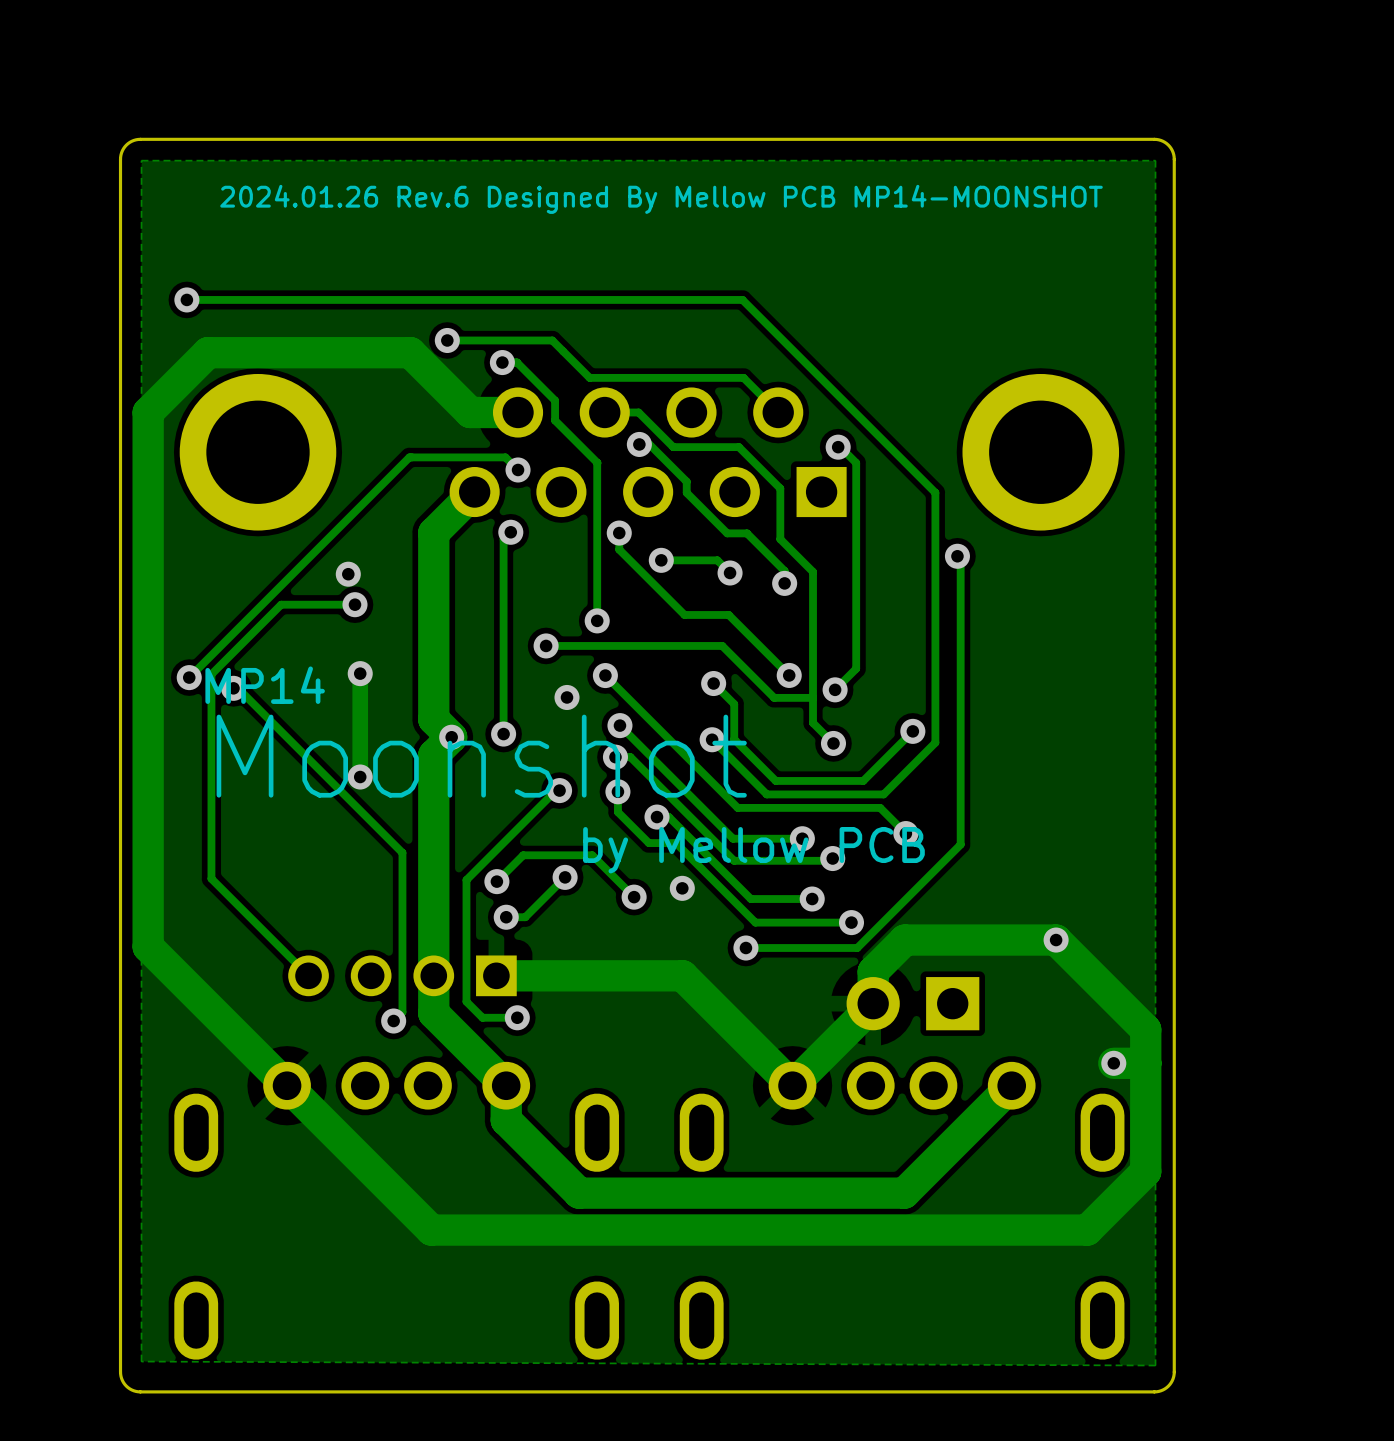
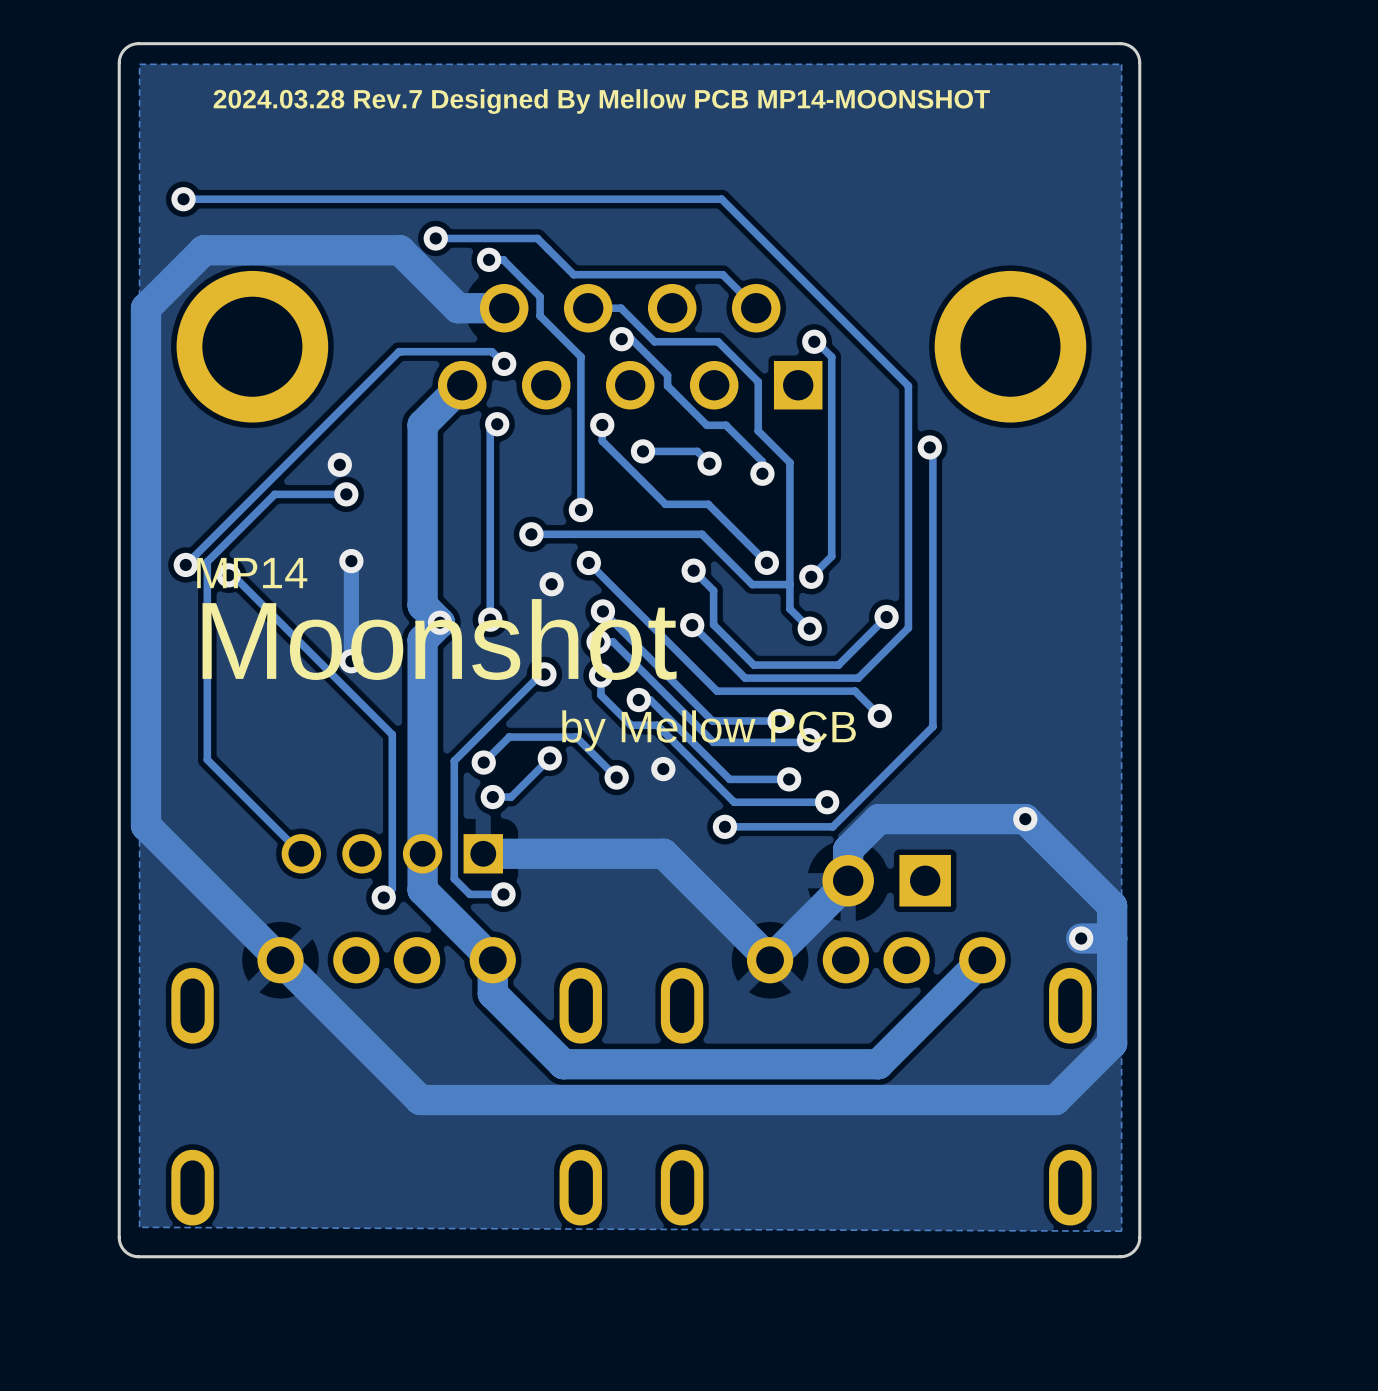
text: 2024.01.26 Rev.6 Designed By Mellow PCB MP14-MOONSHOT (661, 199) -> 2024.03.28 Rev.7 Designed By Mellow PCB MP14-MOONSHOT (601, 101)

